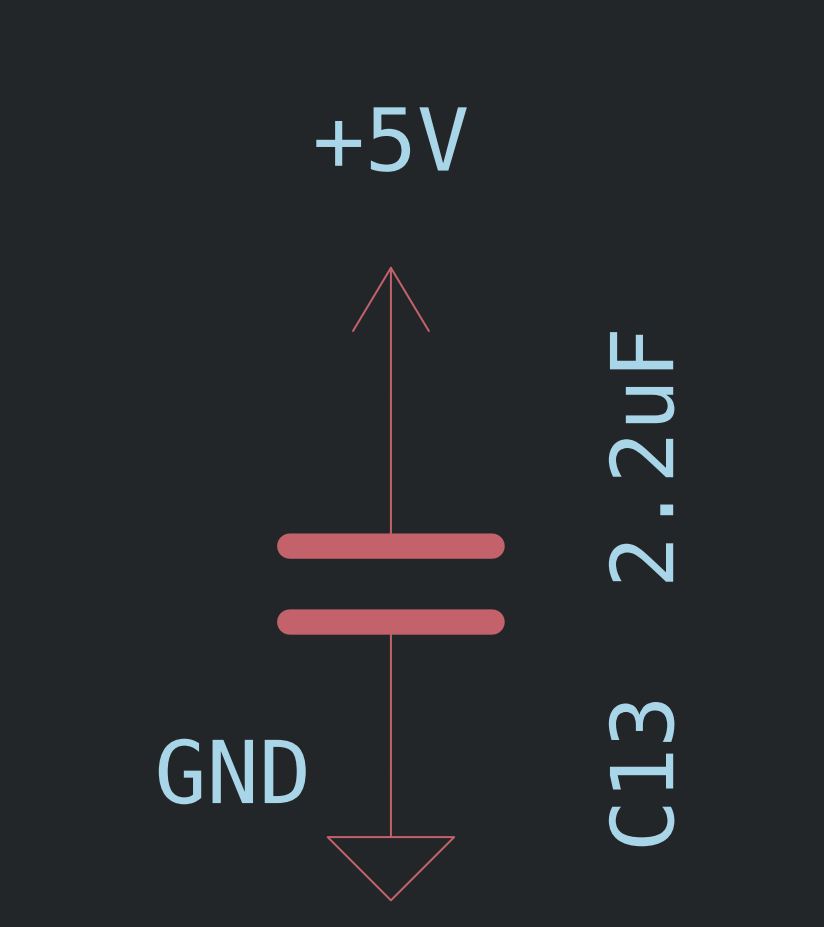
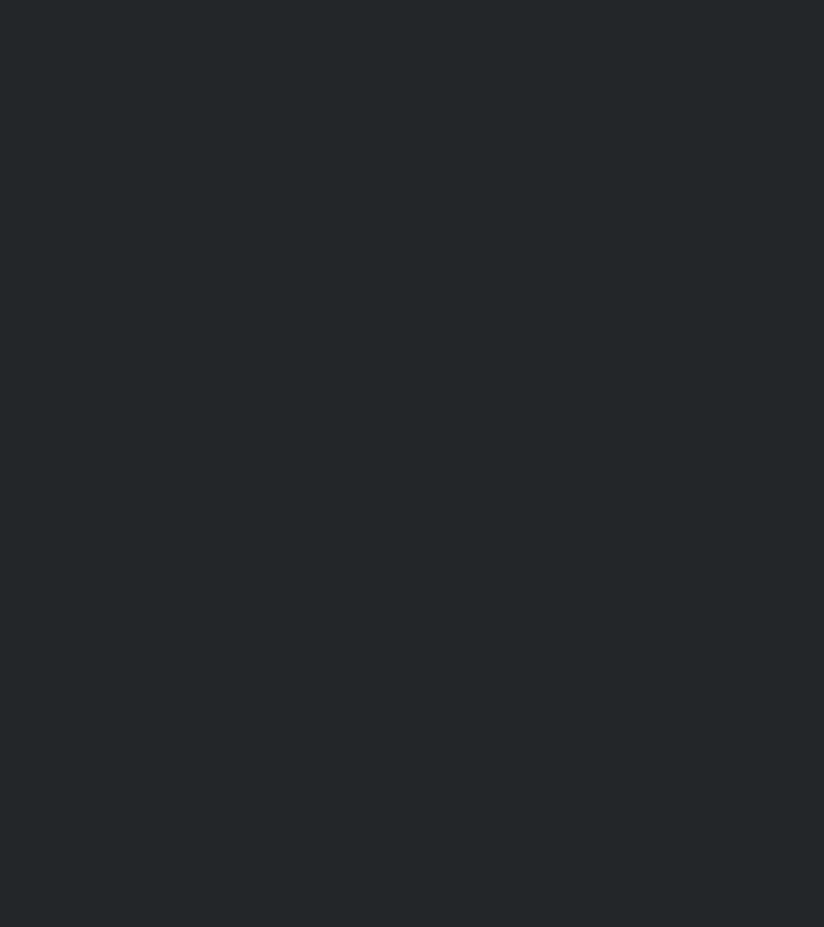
power symbol: +5V (390, 331) -> none
C13: 2.2uF (390, 584) -> none
power symbol: GND (390, 837) -> none

